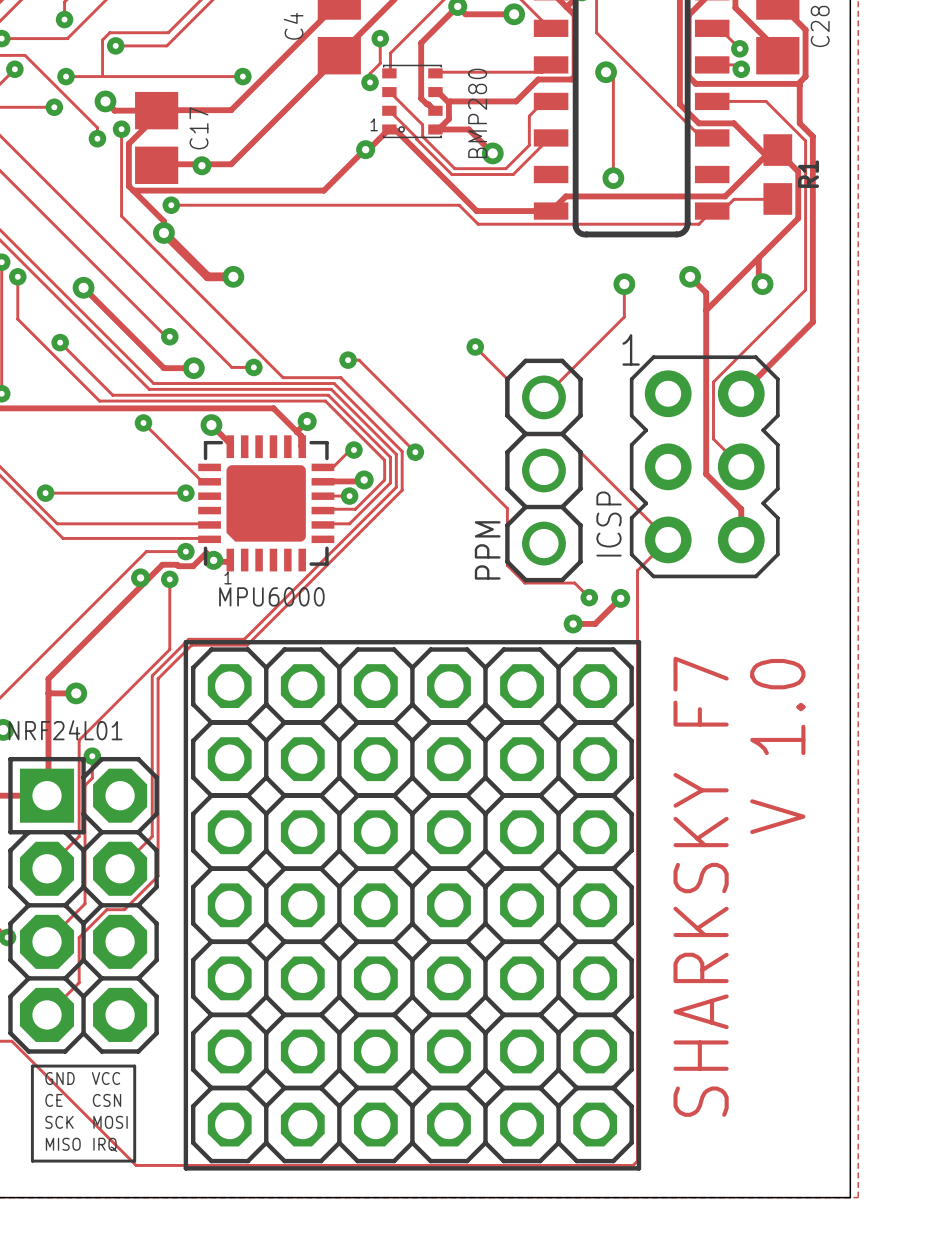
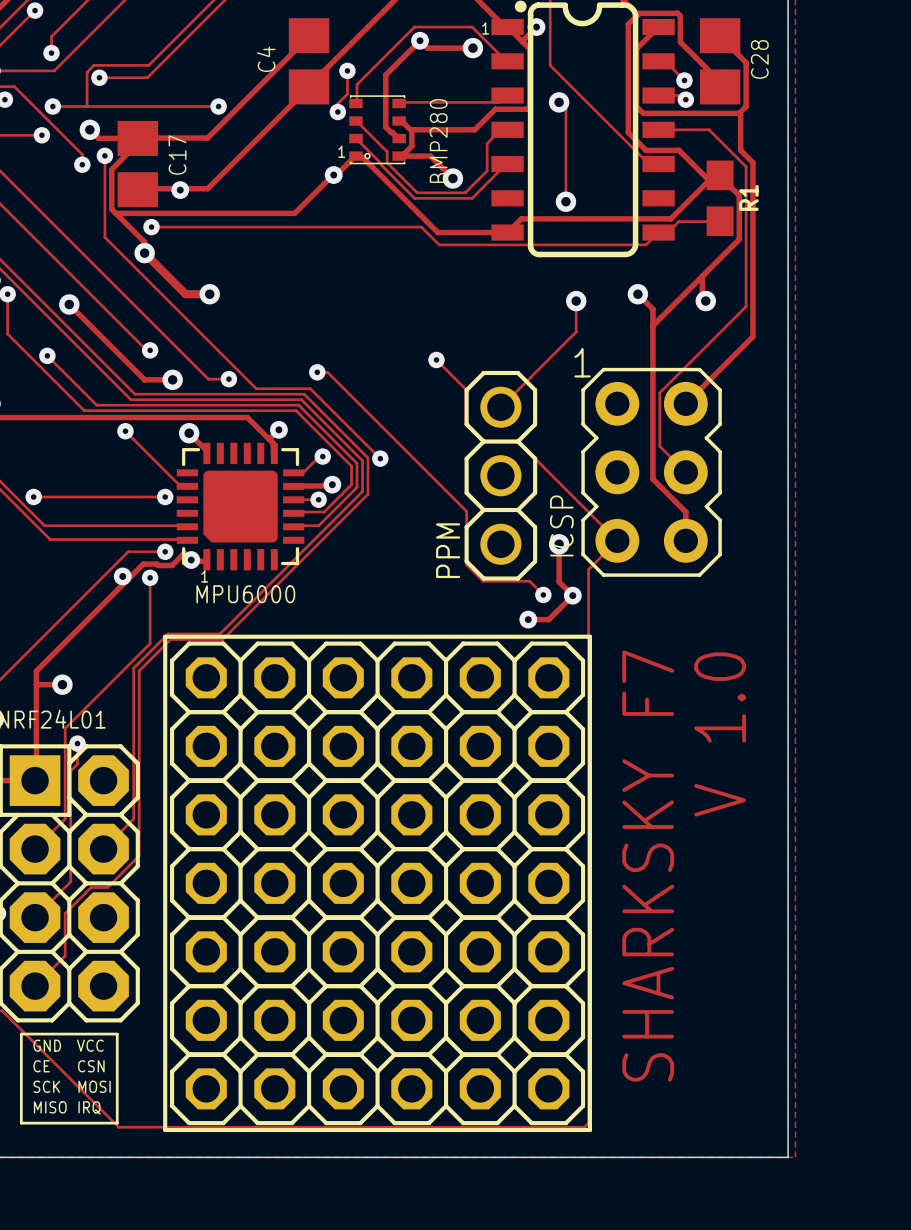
track: none -> (559, 544) (559, 581) (572, 595)
via: none -> (559, 544)

